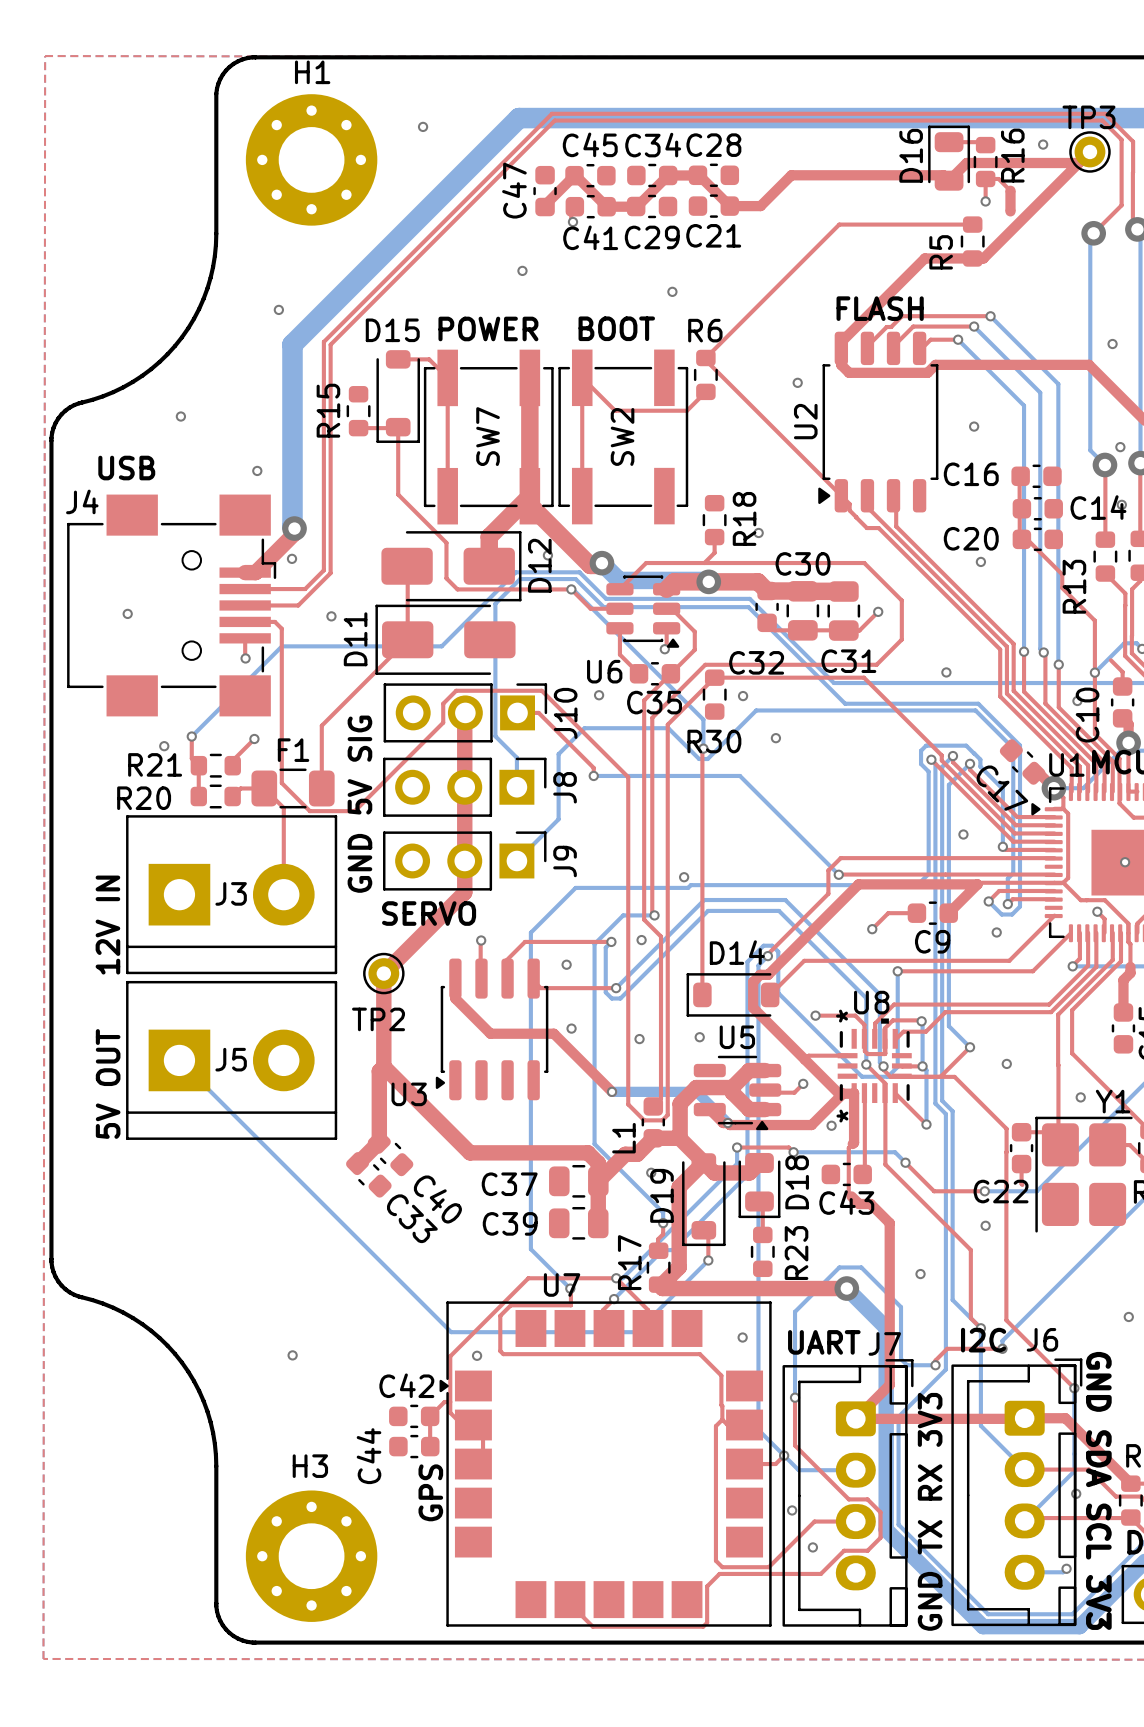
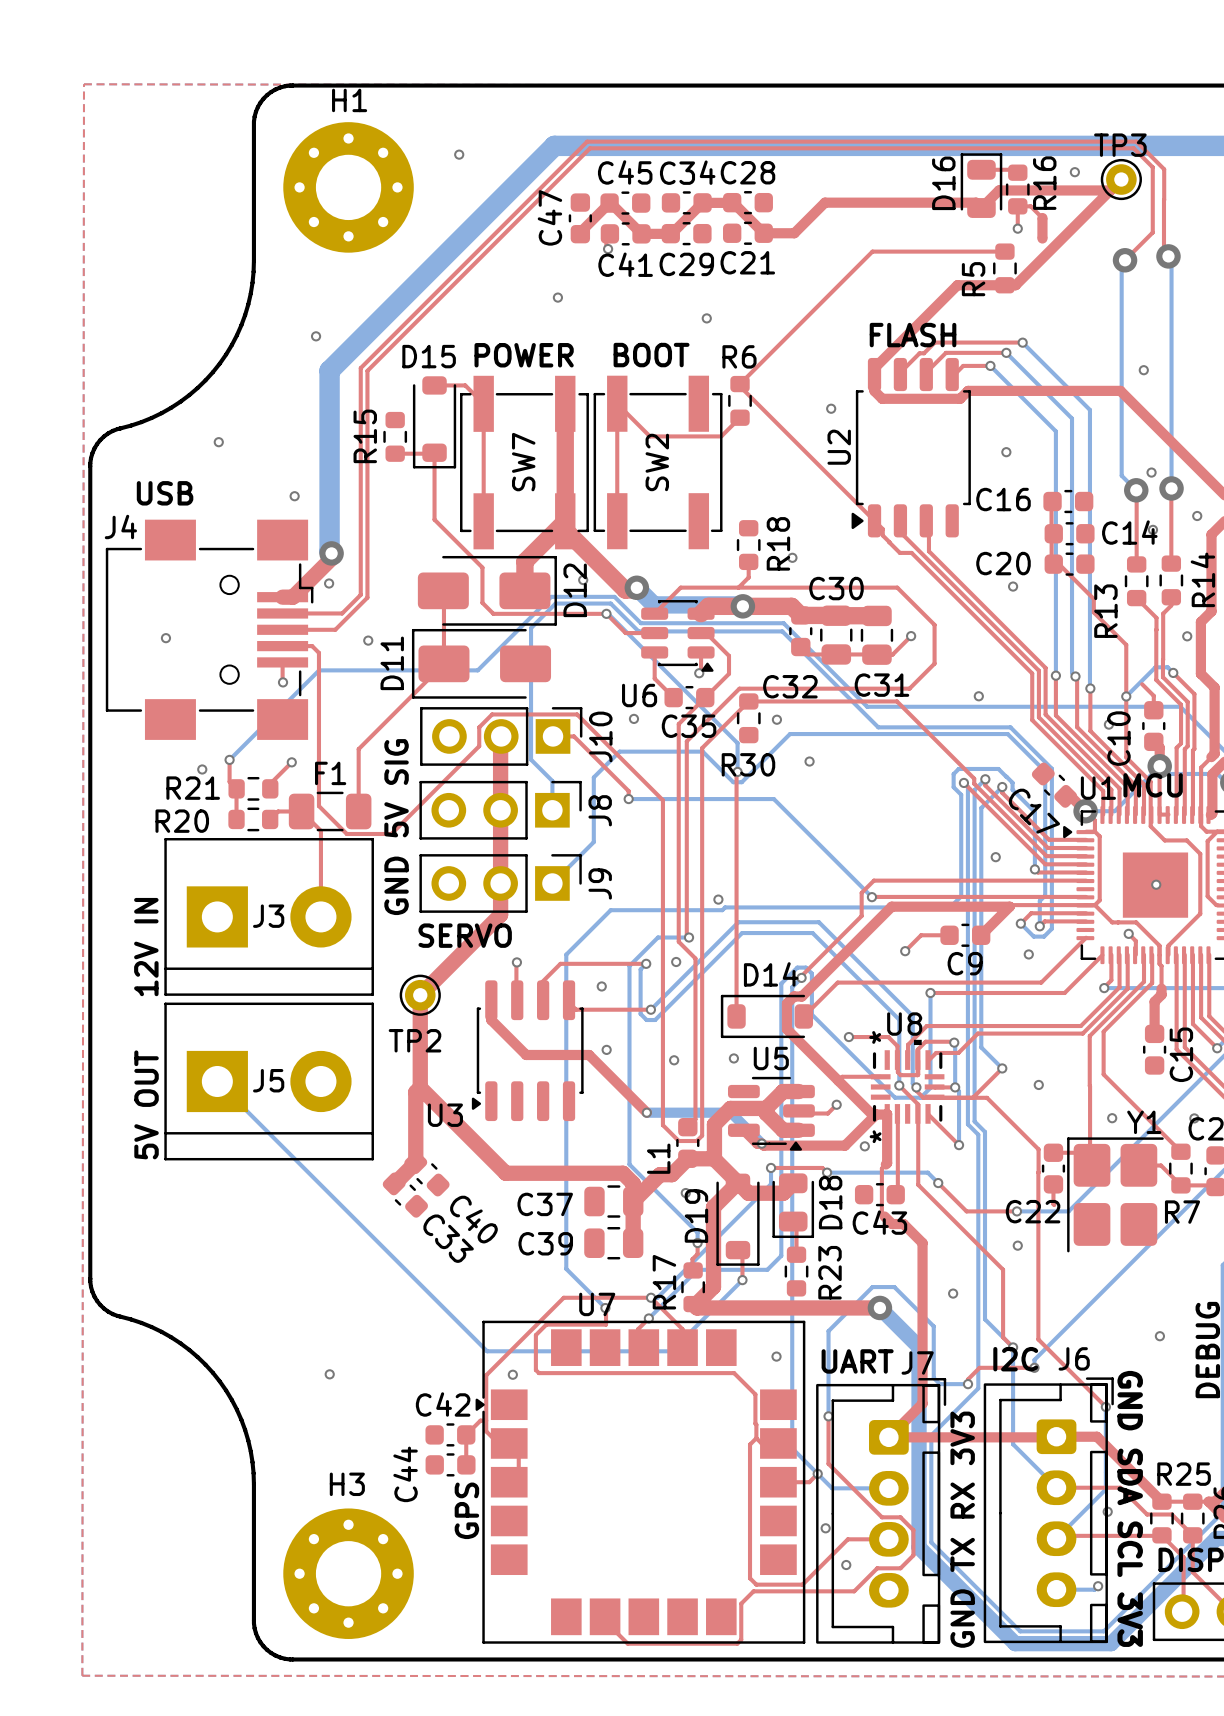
bottom track: (747, 1174) (672, 1250) -> (781, 1195) (781, 1255) (767, 1269) (706, 1269)

